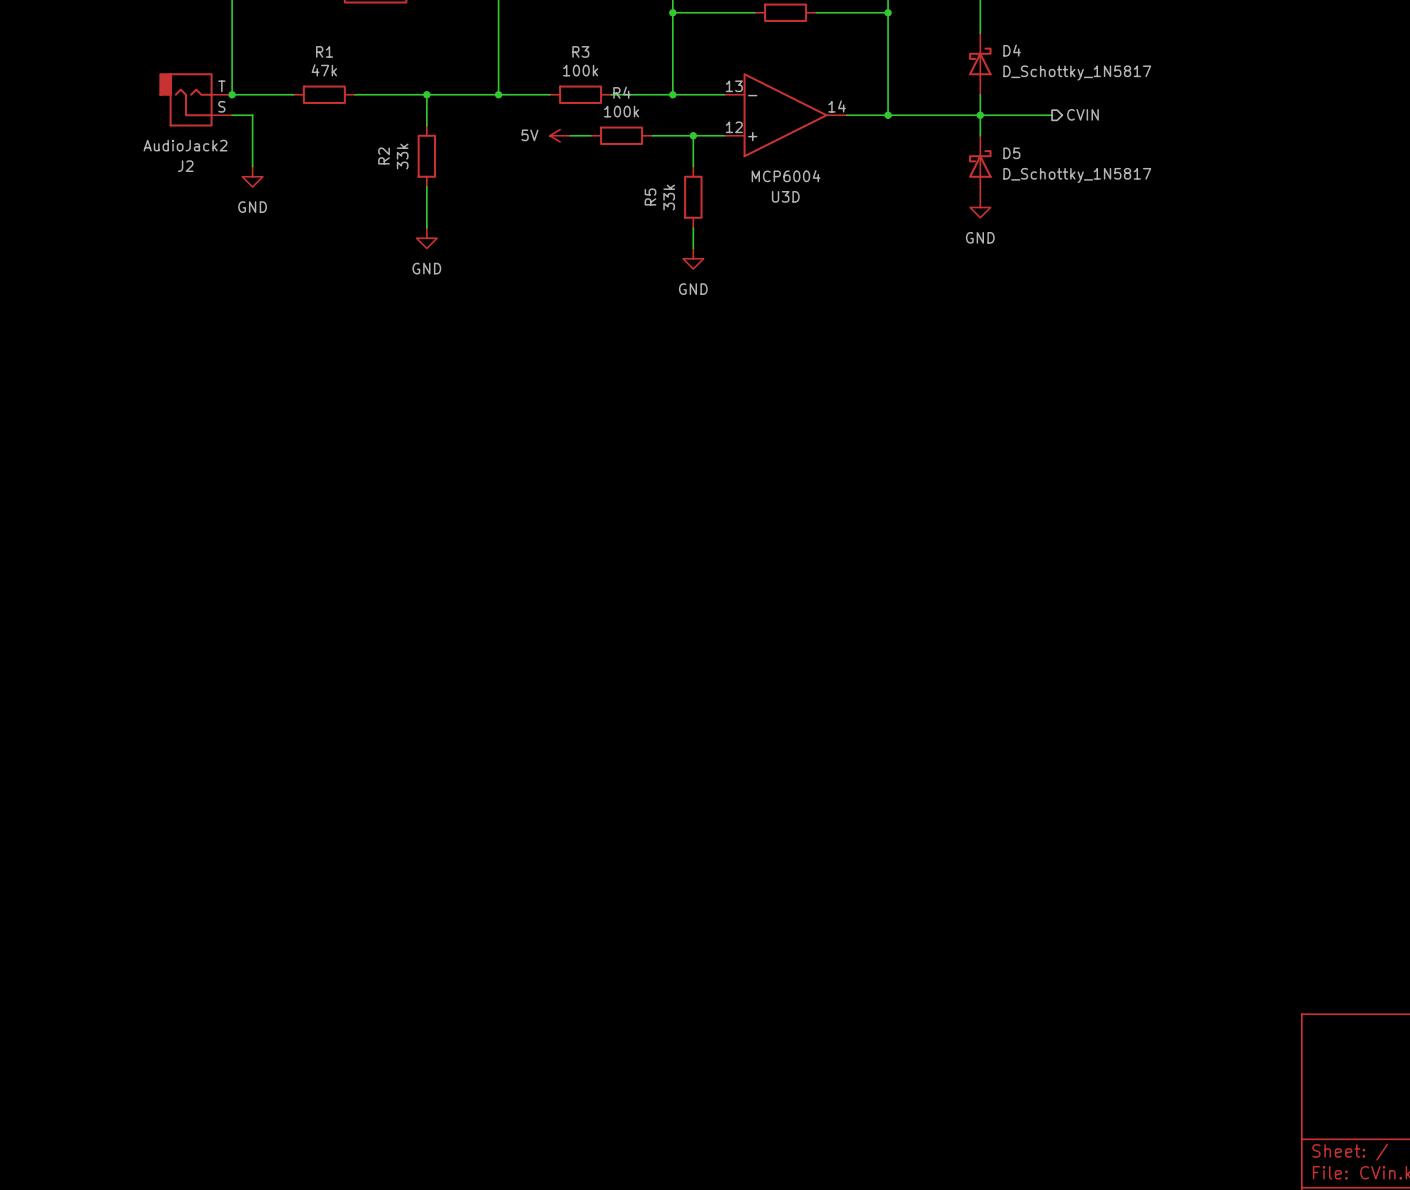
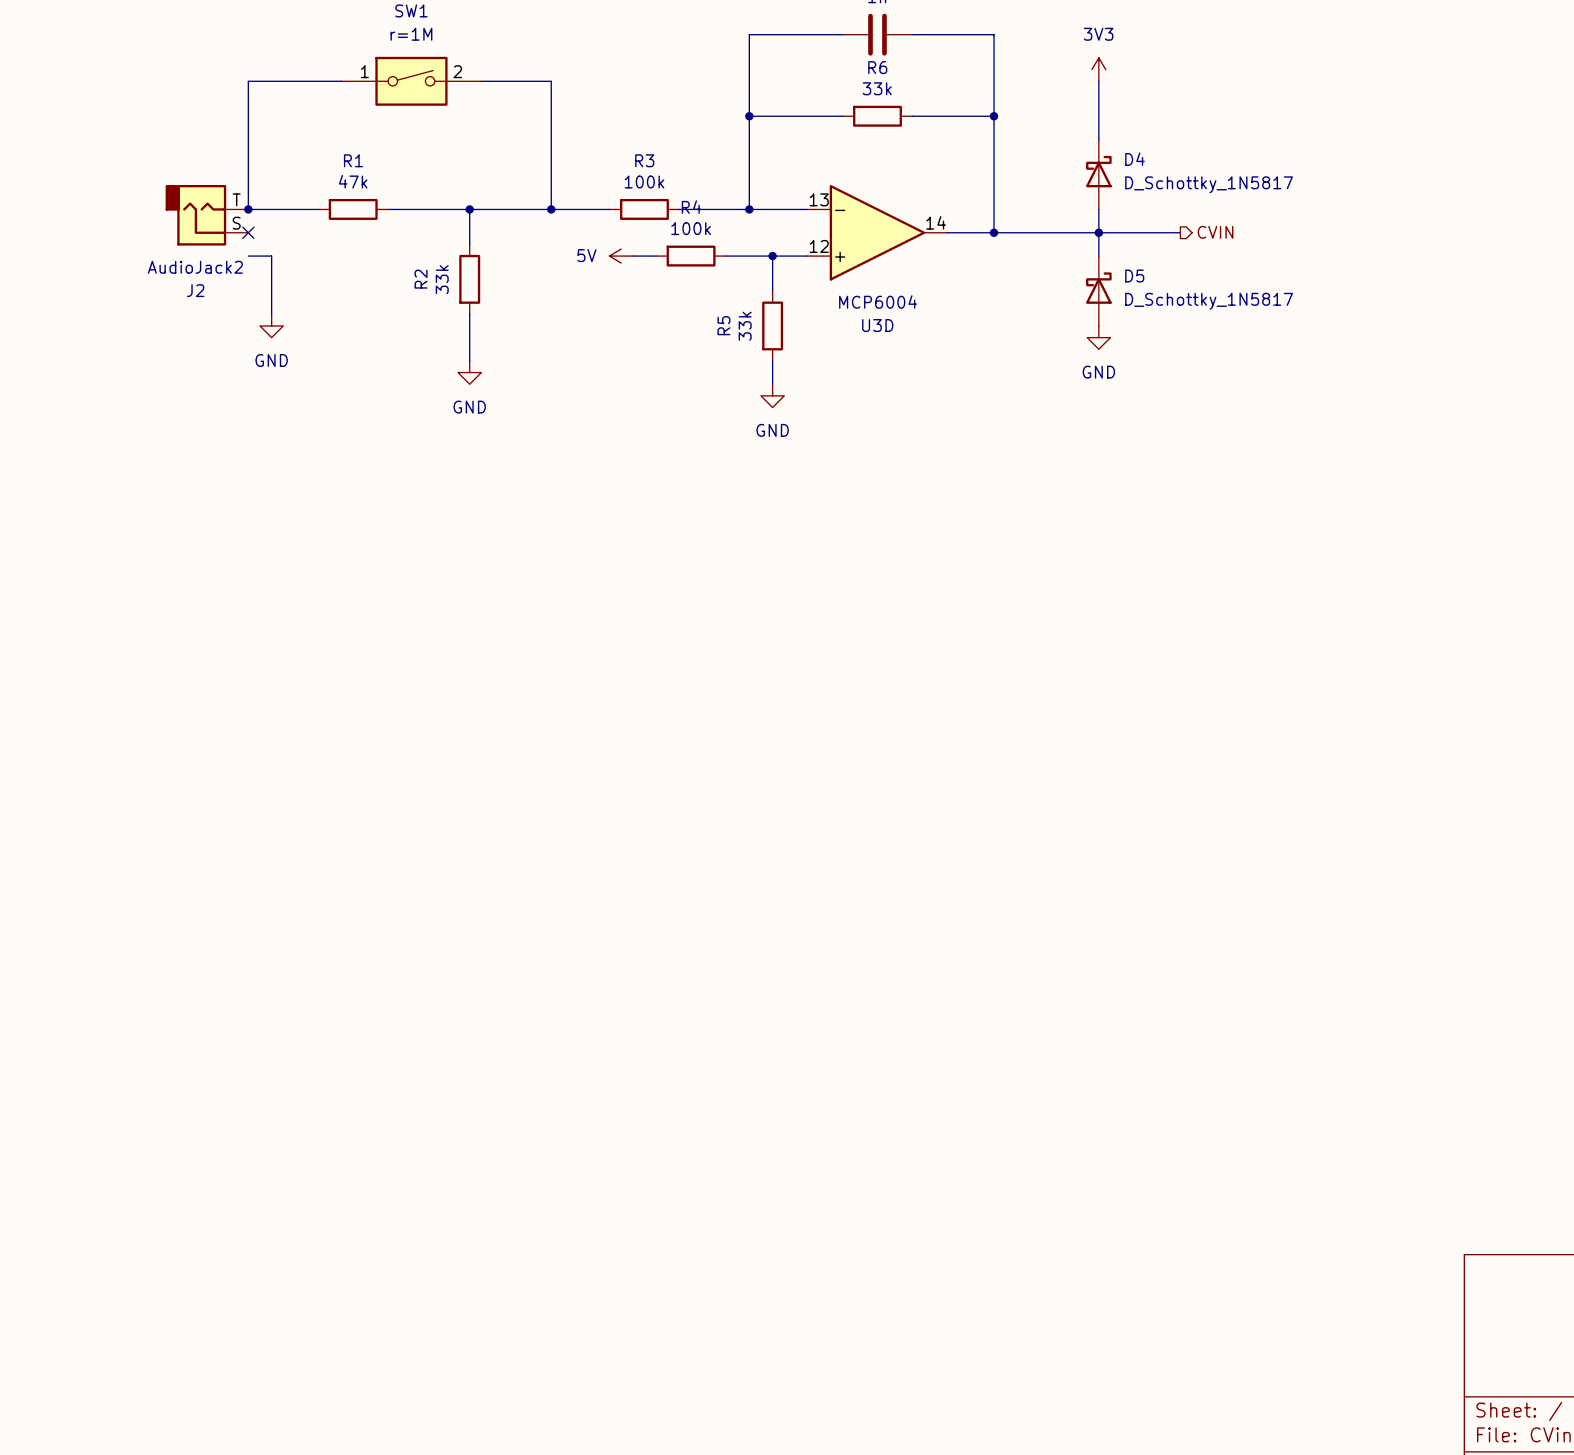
wire: (232, 115) (252, 115) (252, 135) -> (248, 256) (271, 256)
no-connect mark: none -> (248, 232)
power symbol position: GND (252, 176) -> GND (271, 325)

